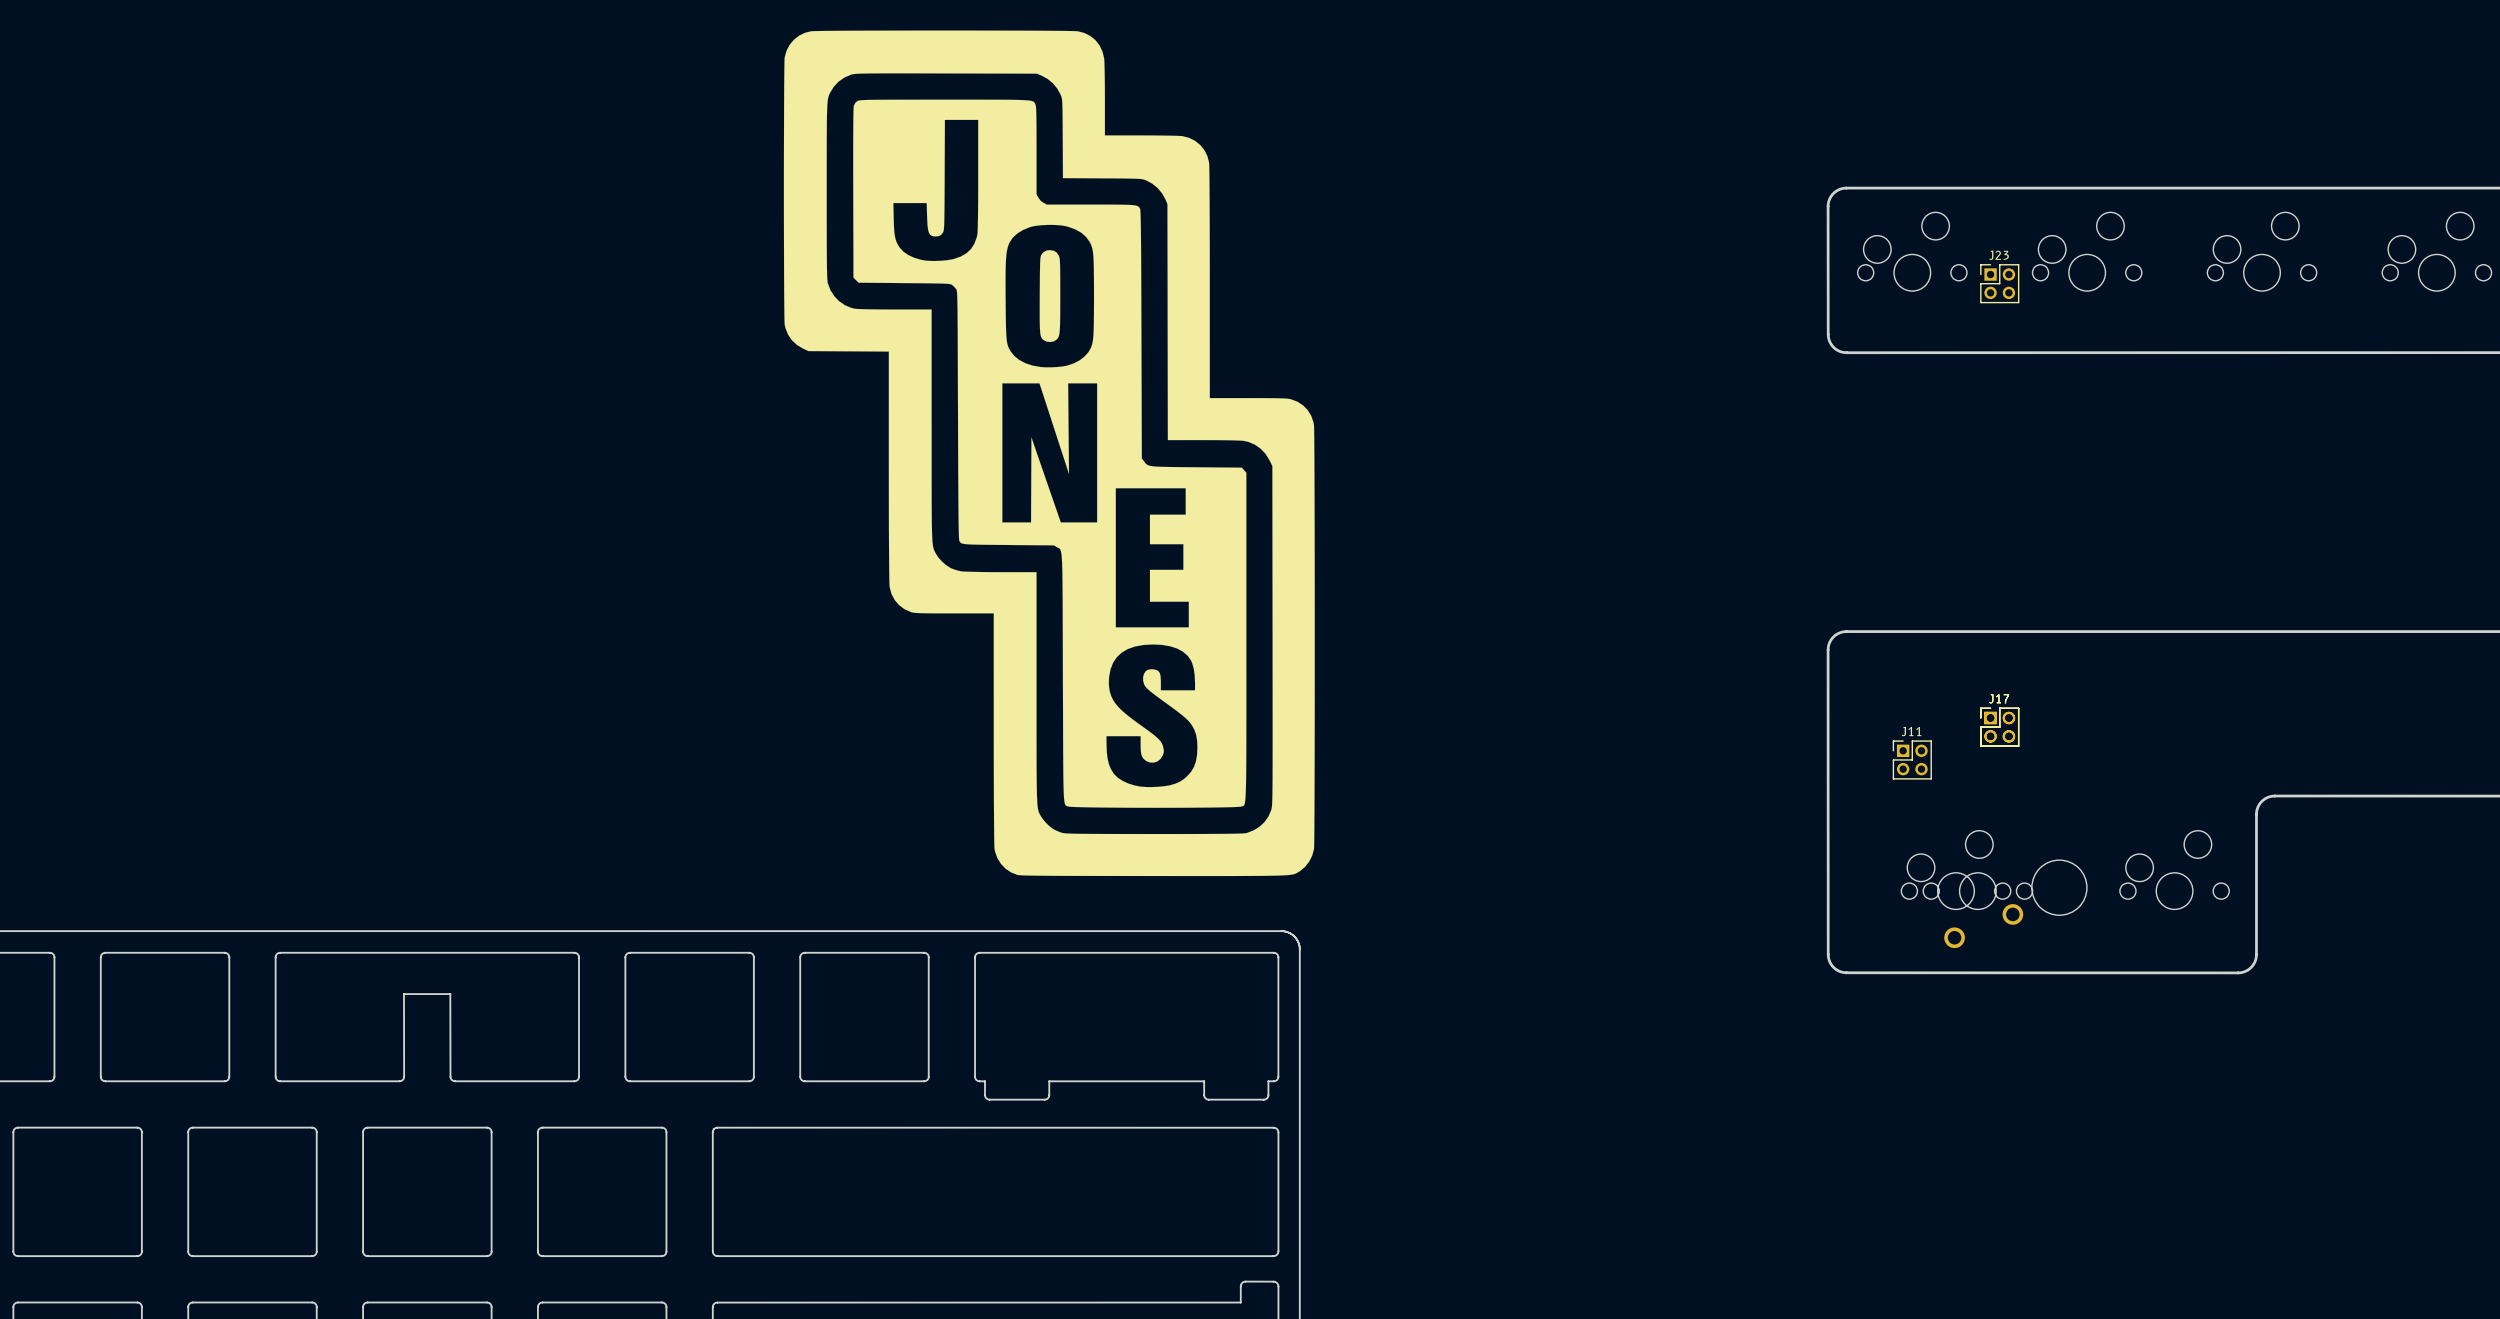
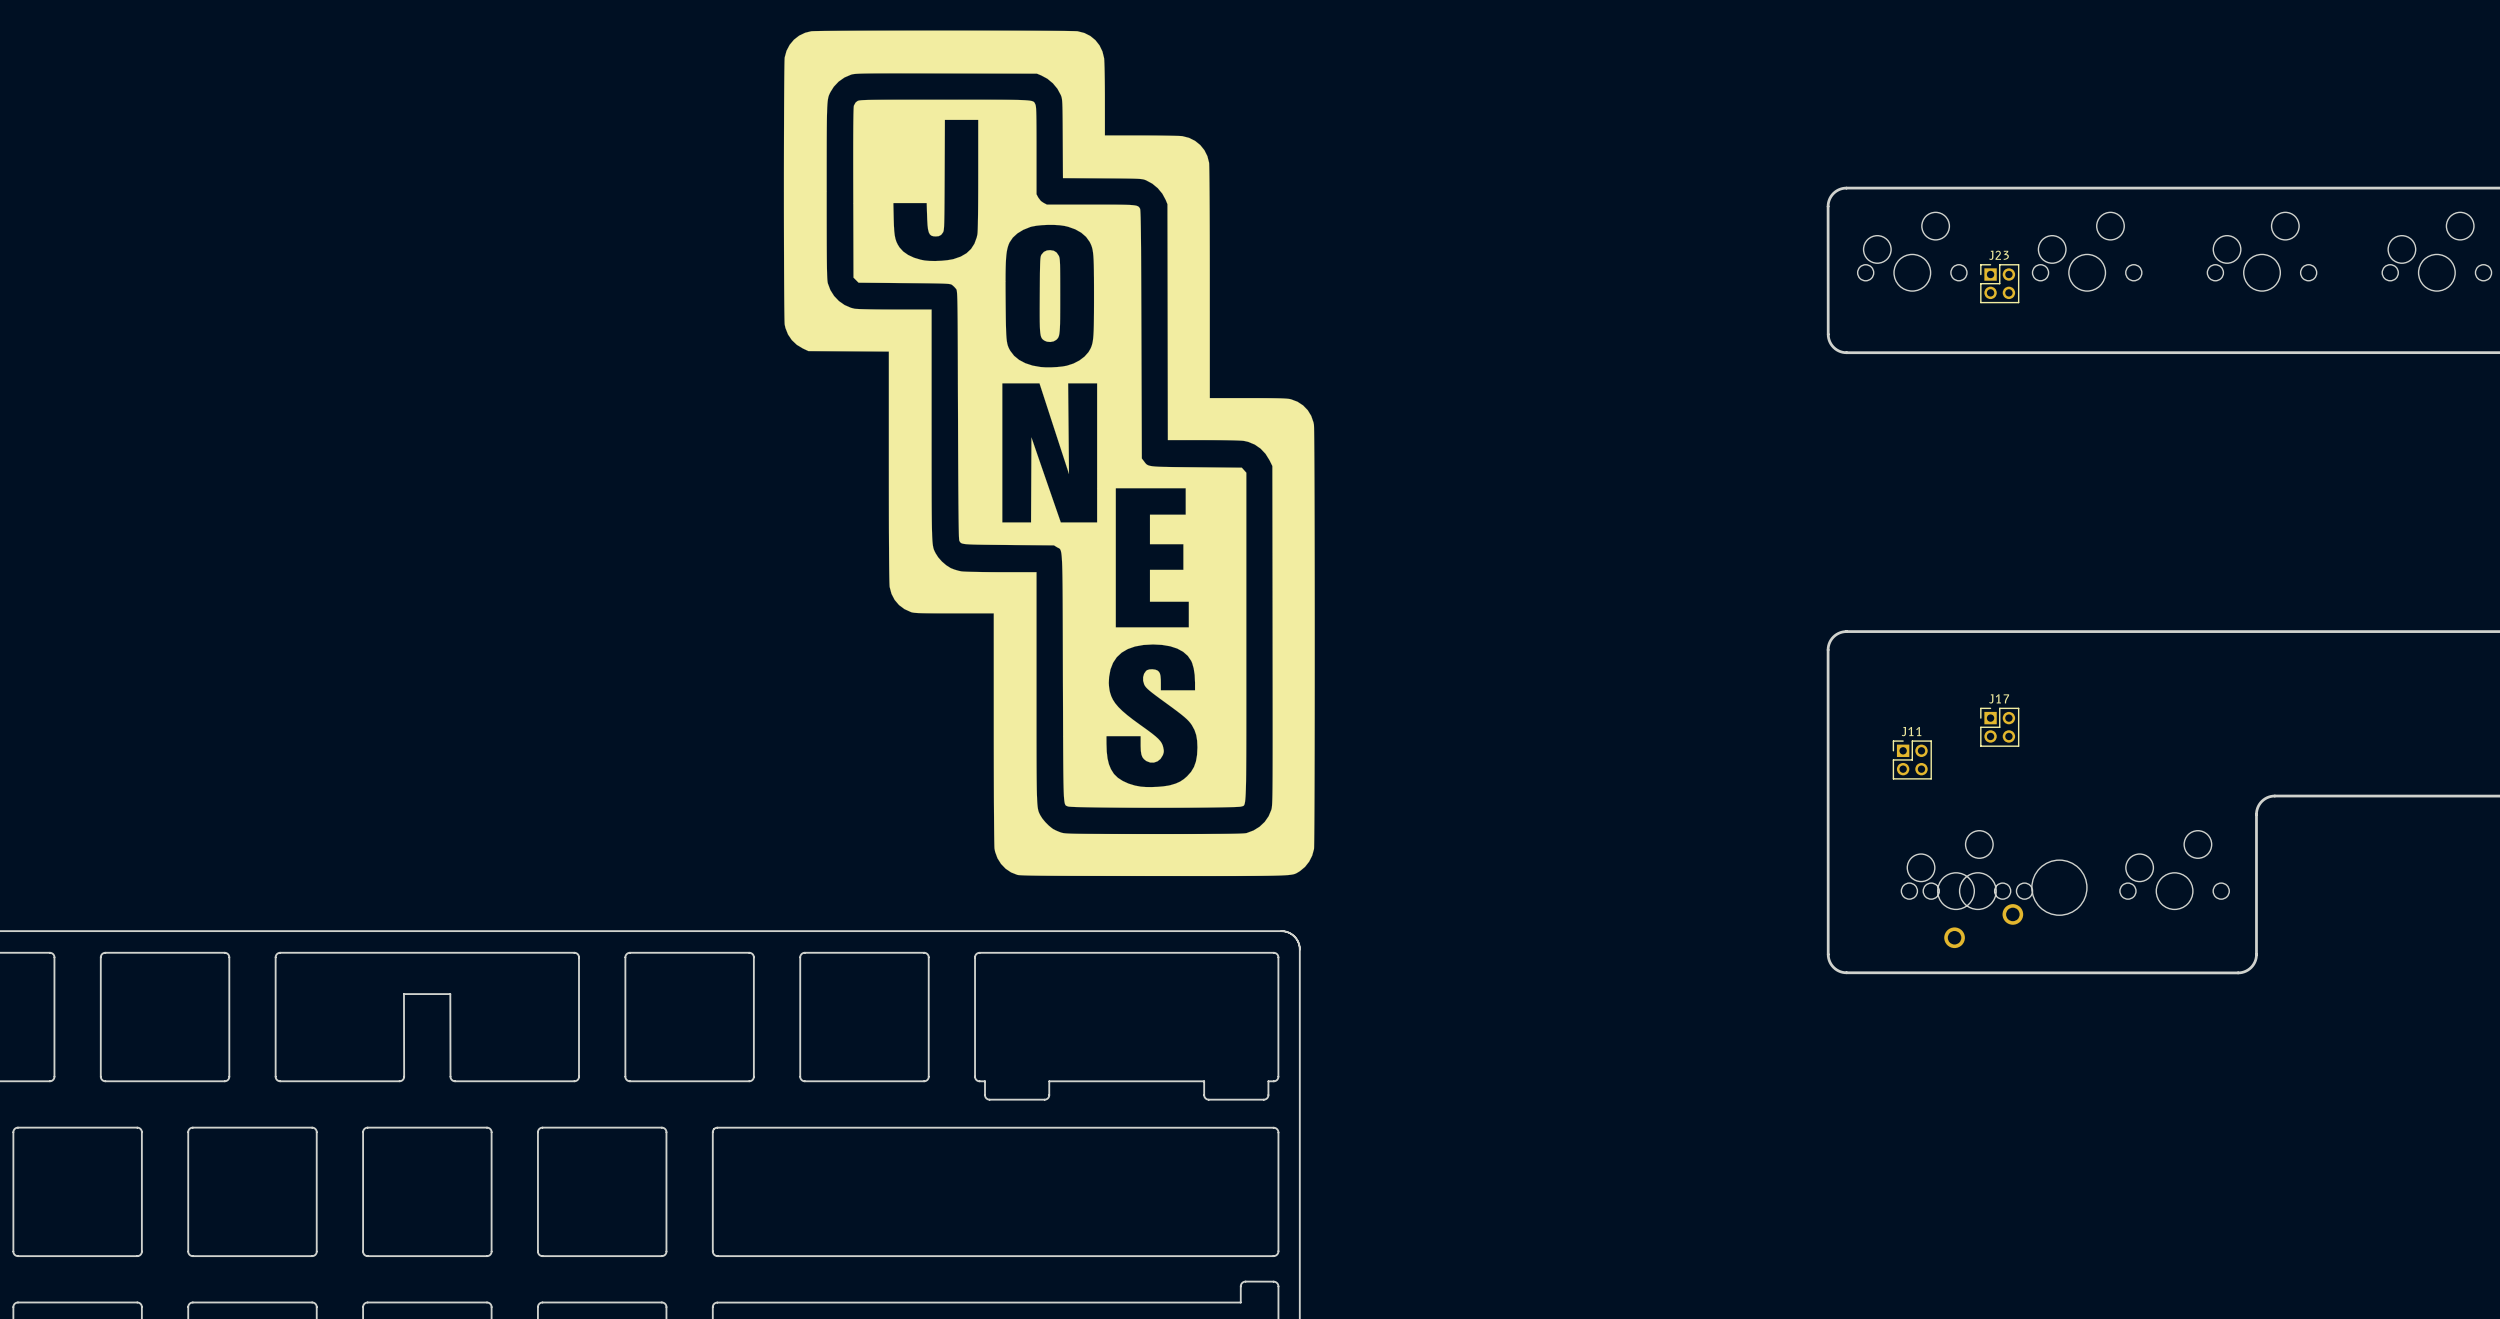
J17: (1999, 727) -> none
J17: (1999, 727) -> none
J17: none -> (1999, 727)

